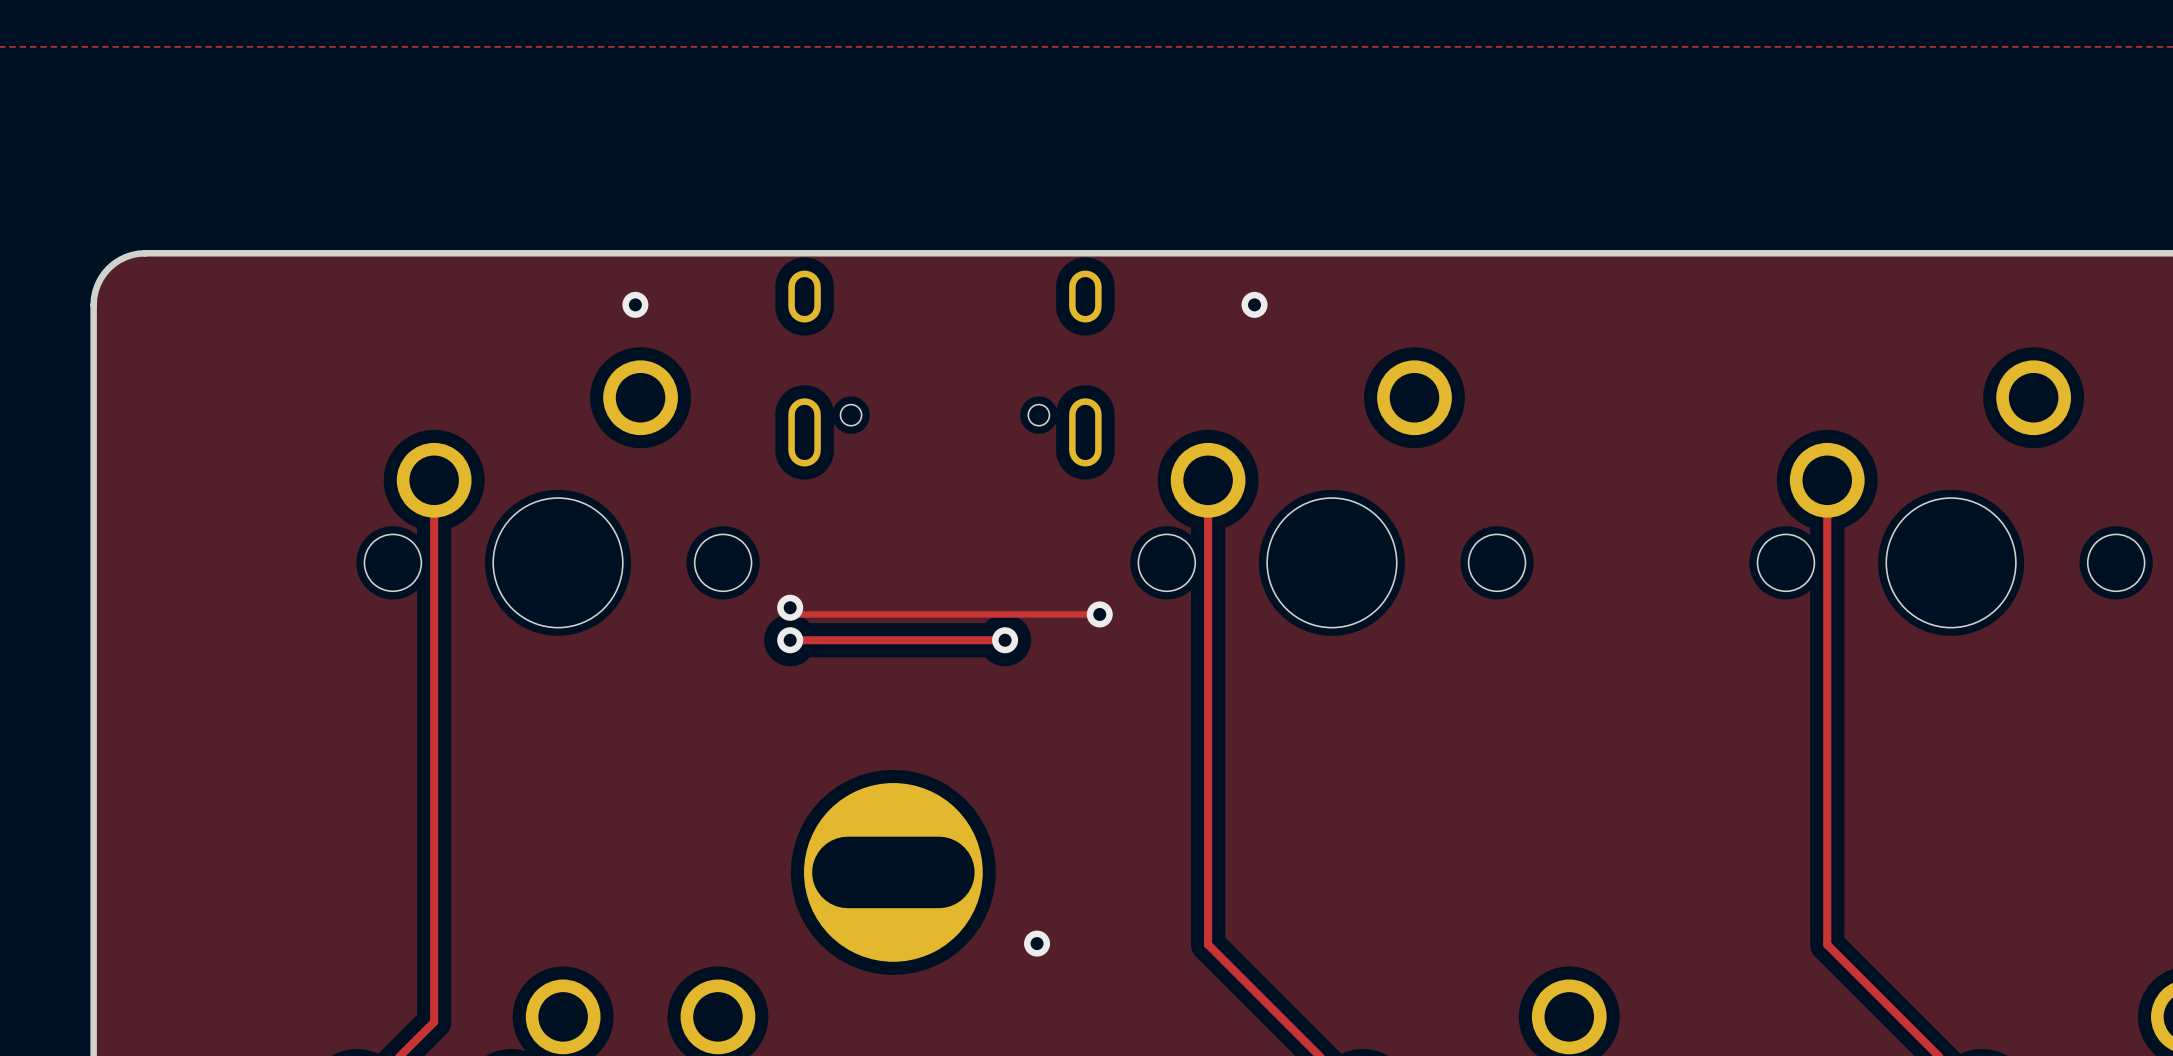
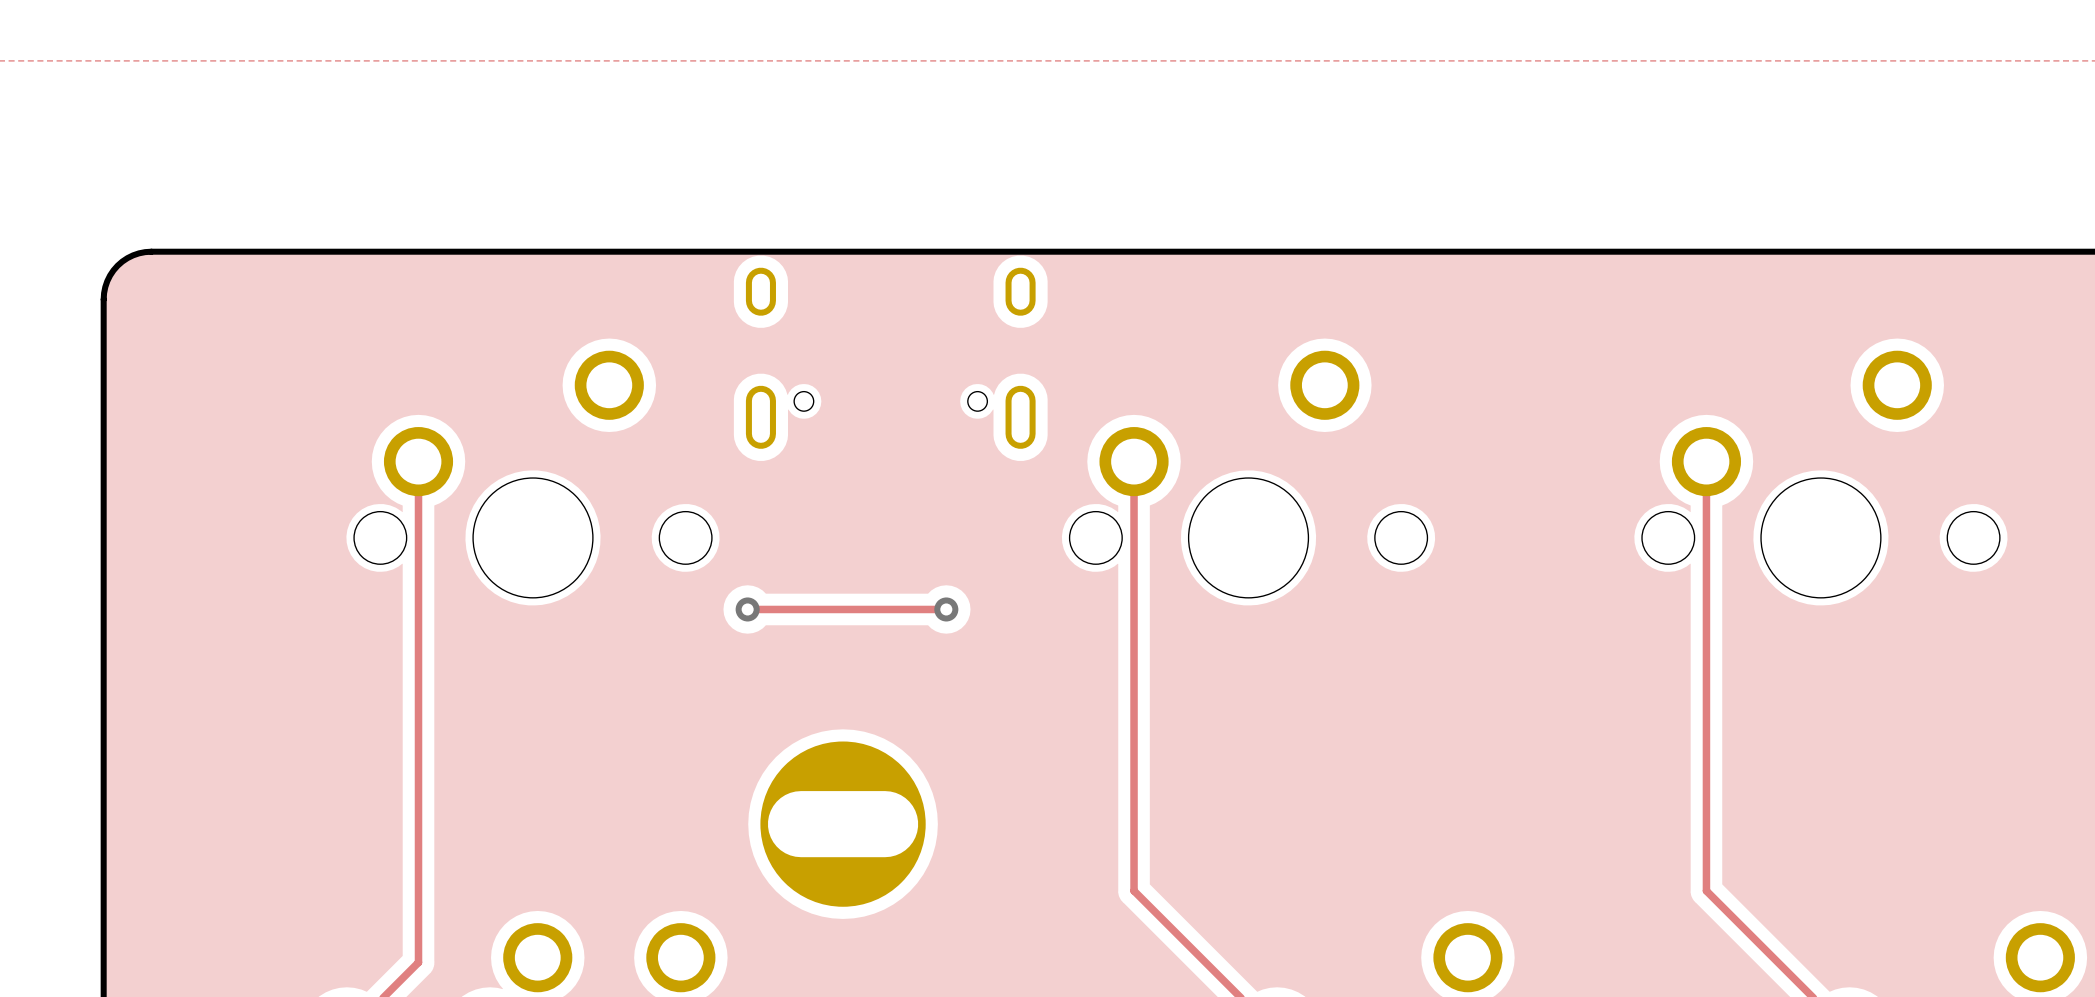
via: (635, 304) -> none
via: (1254, 304) -> none
track: (790, 607) (796, 614) (1099, 614) -> none
via: (790, 607) -> none
via: (1099, 614) -> none
via: (1037, 943) -> none

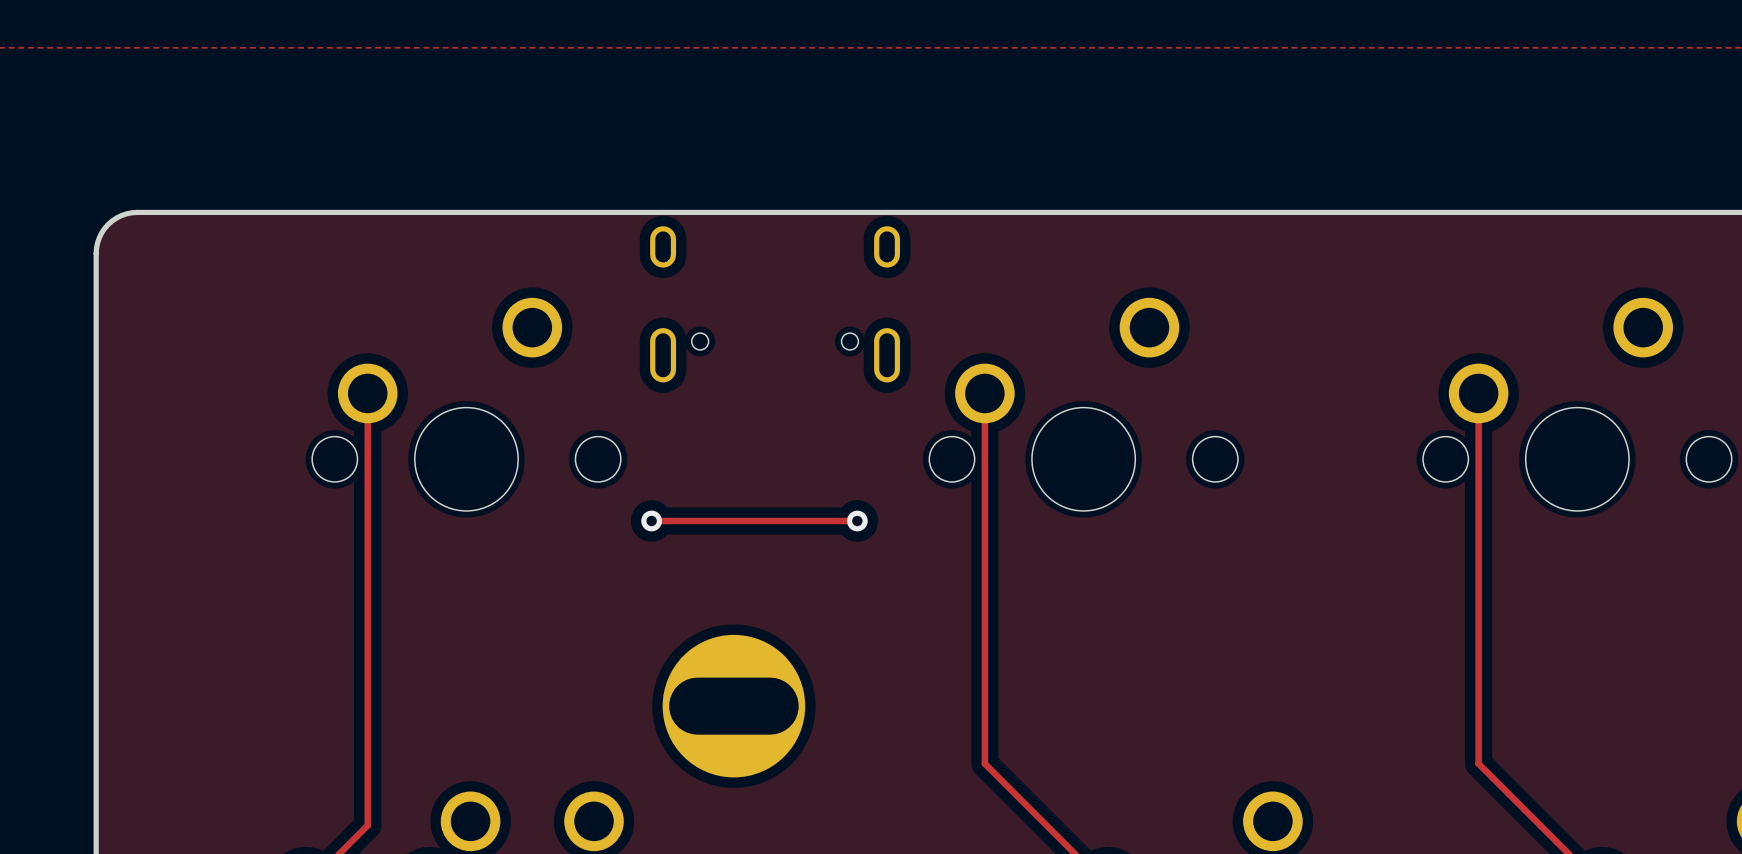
track: none -> (822, 521) (857, 521)
via position: (946, 609) -> (857, 521)

